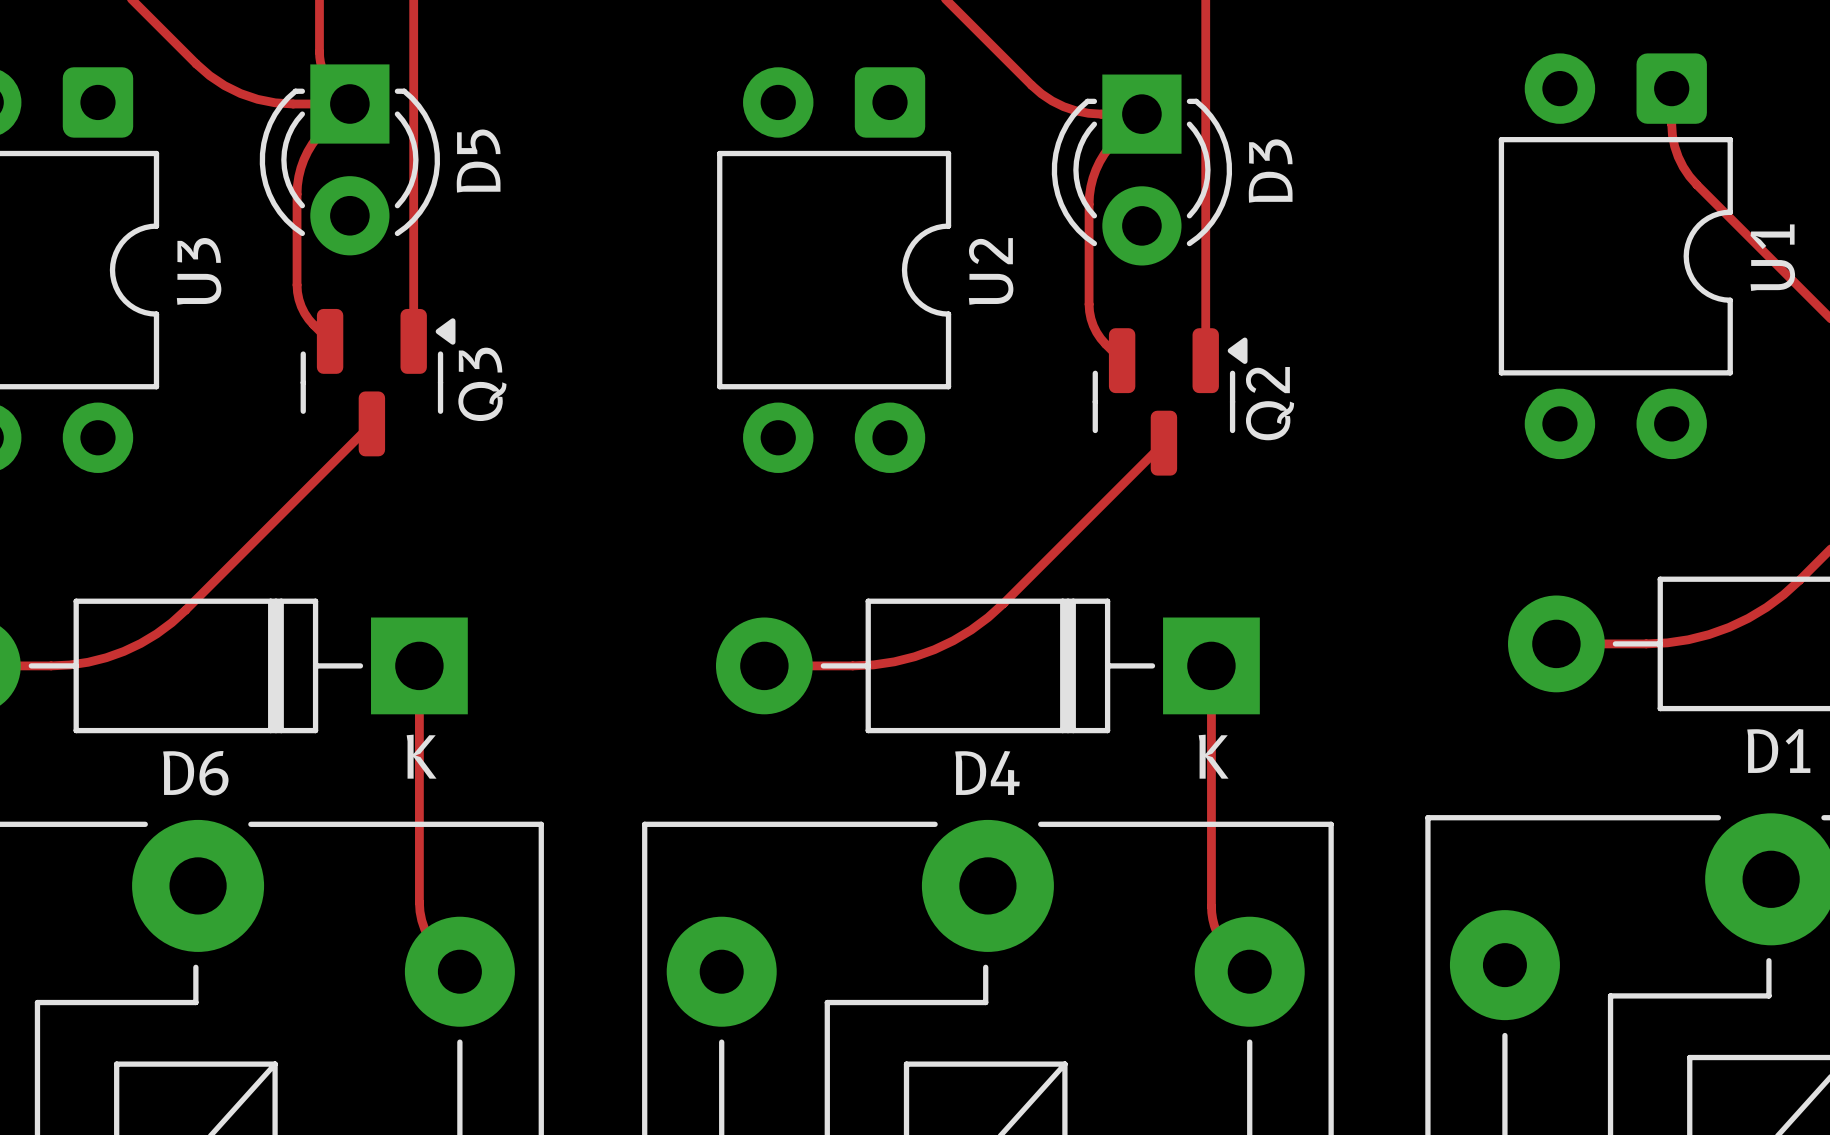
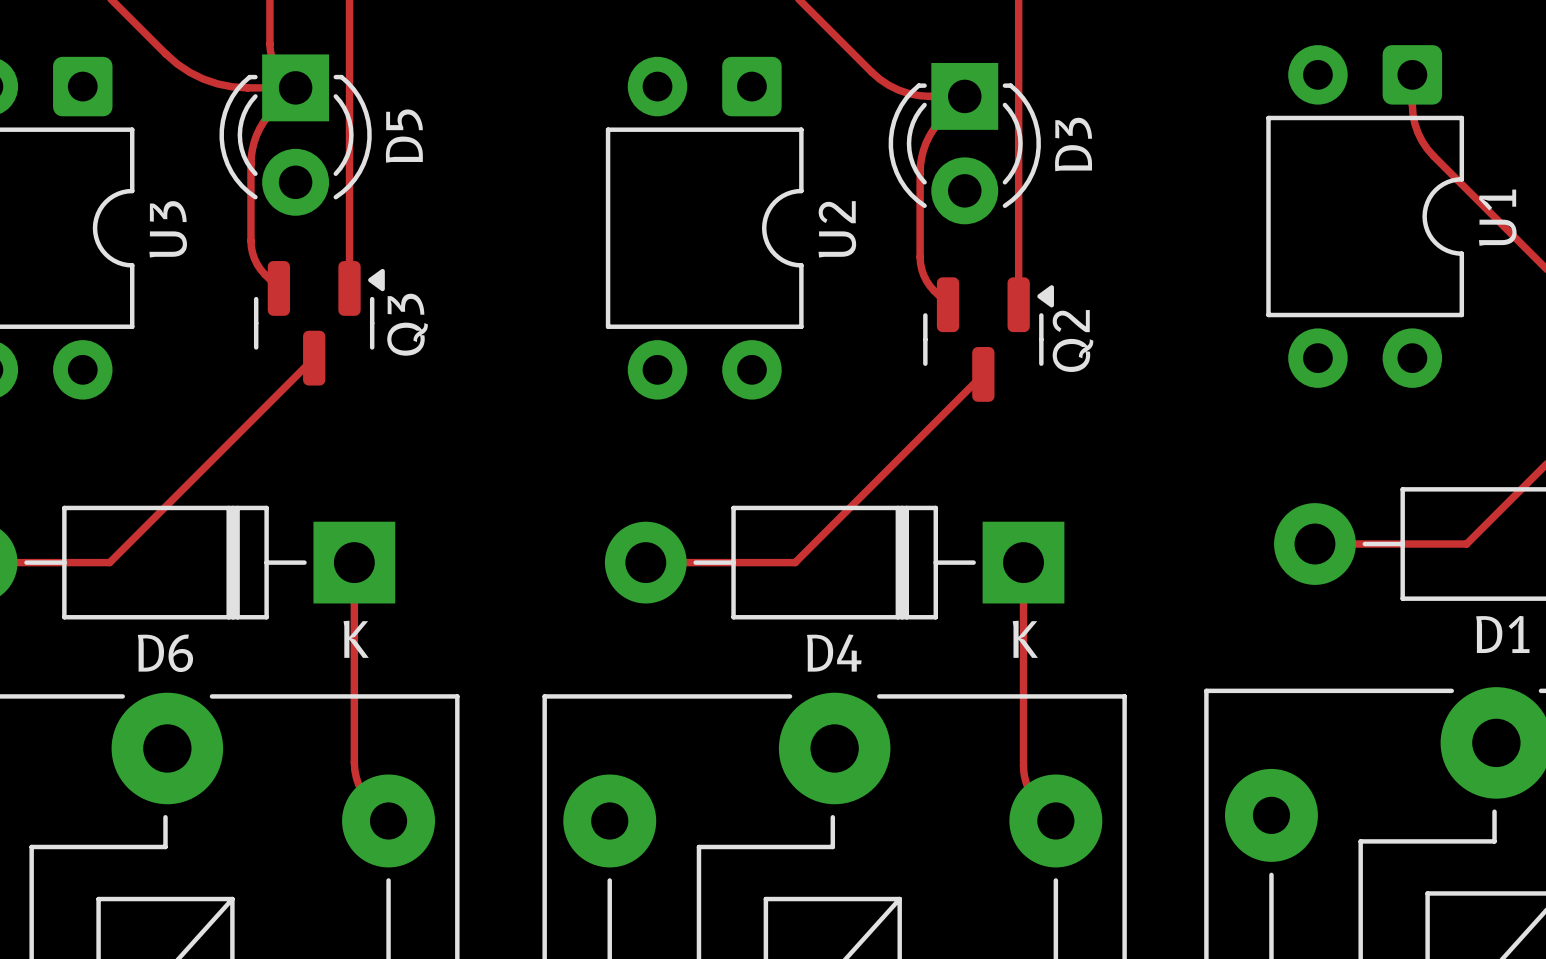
track: (1799, 580) (1766, 607) (1729, 627) (1688, 639) (1646, 643) -> (1520, 490) (1466, 544) (1390, 544)
track: (1003, 603) (971, 629) (934, 649) (894, 661) (852, 665) -> (847, 509) (795, 562) (720, 562)
track: (185, 610) (156, 633) (123, 651) (88, 662) (51, 665) -> (156, 515) (109, 562) (43, 562)

